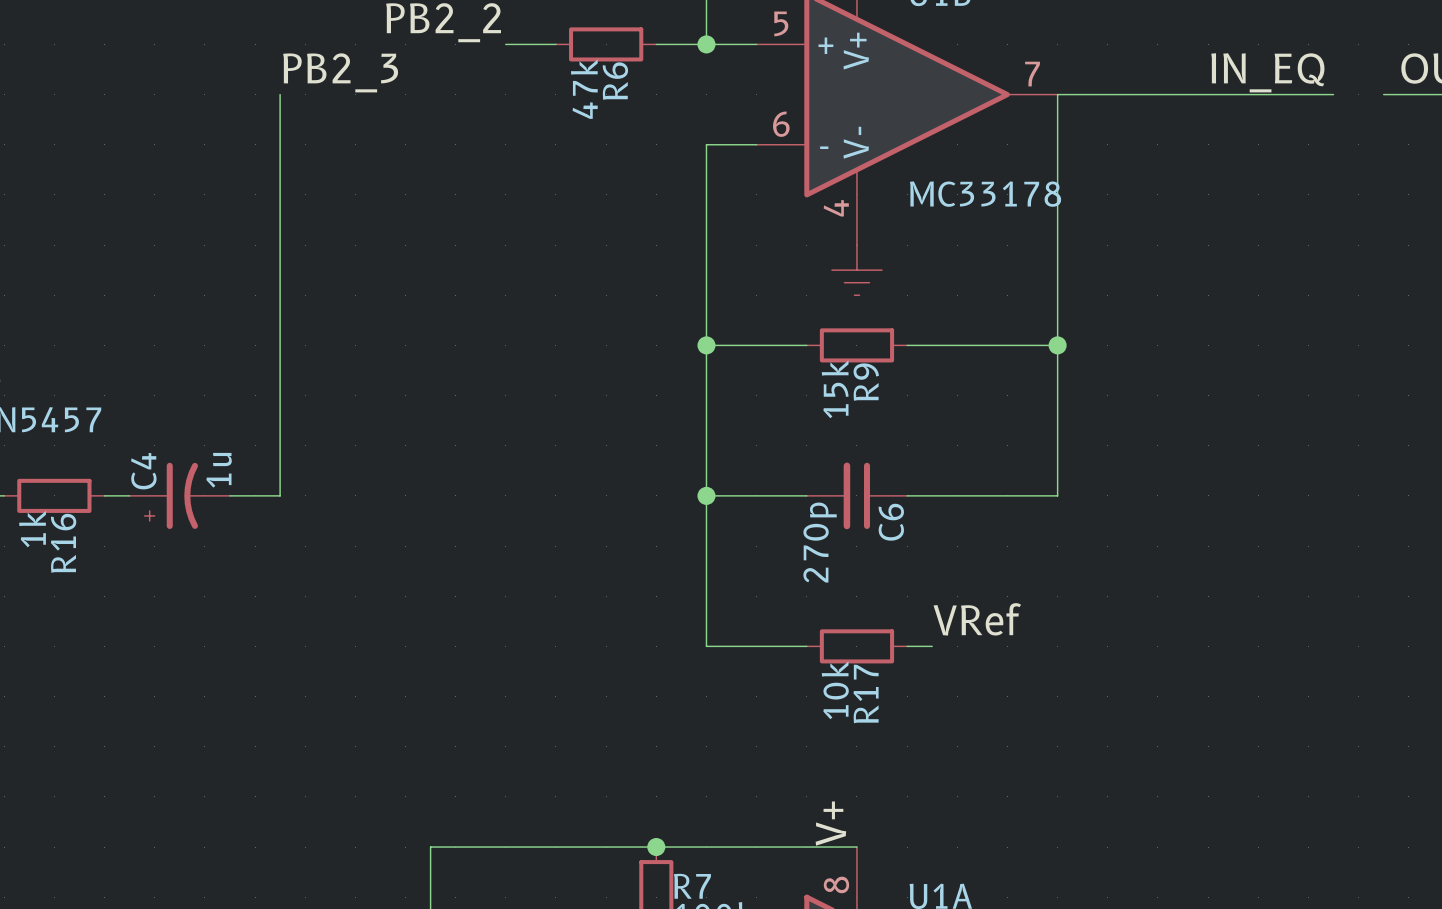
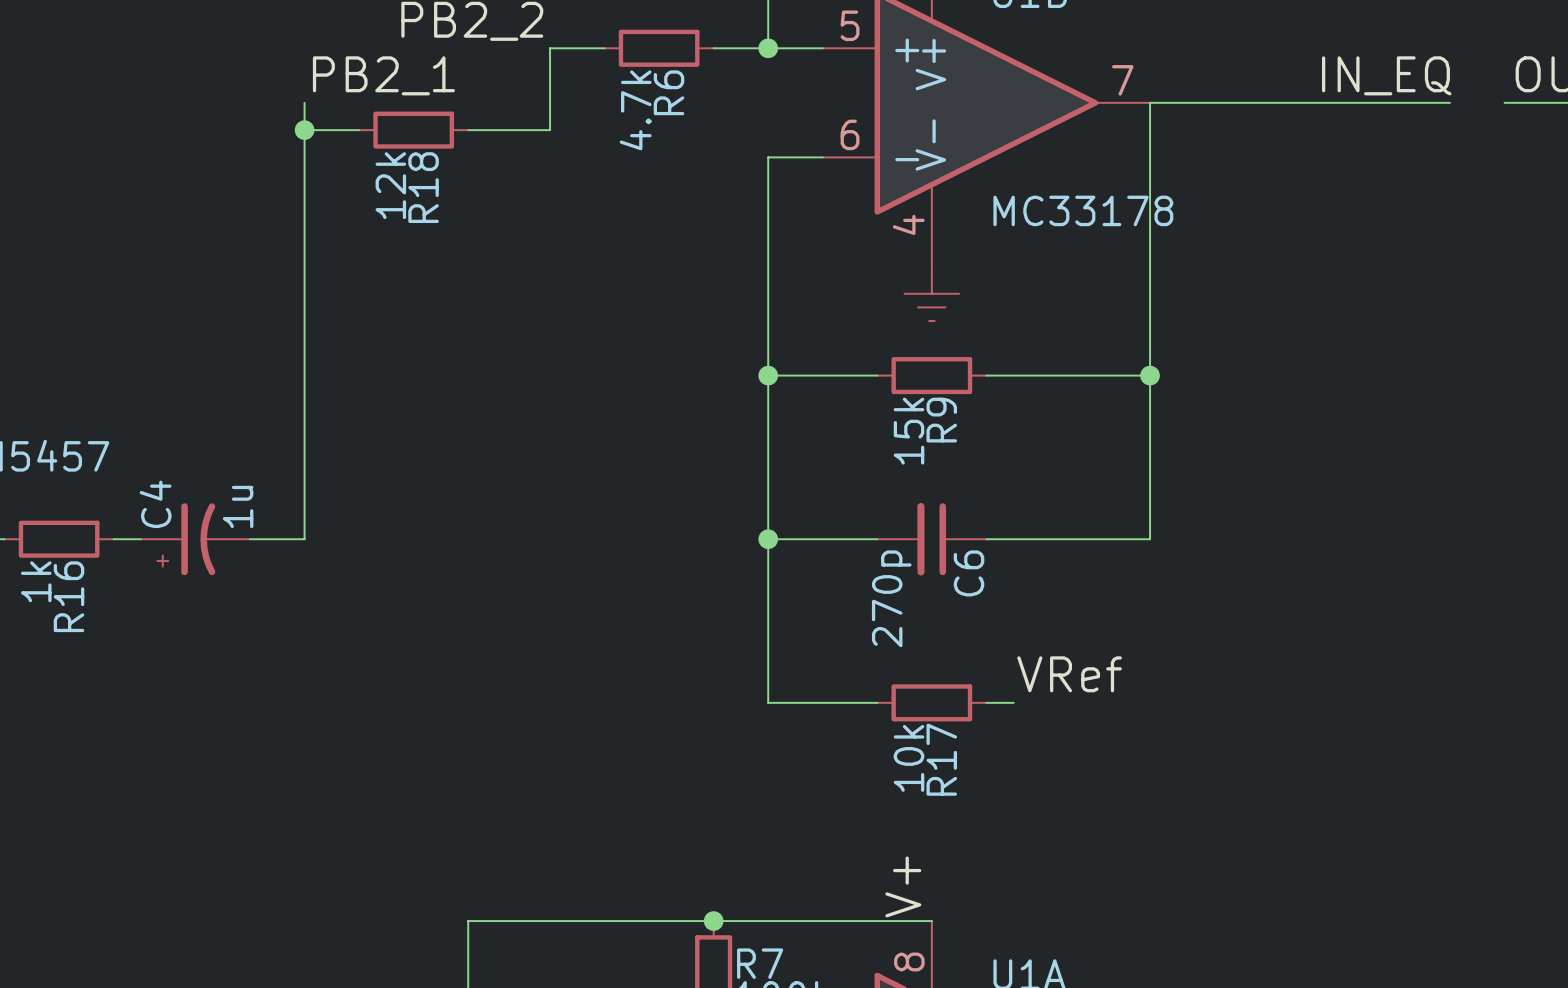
wire: none -> (550, 48) (550, 130) (468, 130)
label: PB2_3 (340, 72) -> PB2_1 (383, 75)
R6 value: 47k (584, 89) -> 4.7k (635, 110)
wire: none -> (304, 130) (359, 130)
junction: none -> (304, 130)
R18: none -> 12k (413, 130)

